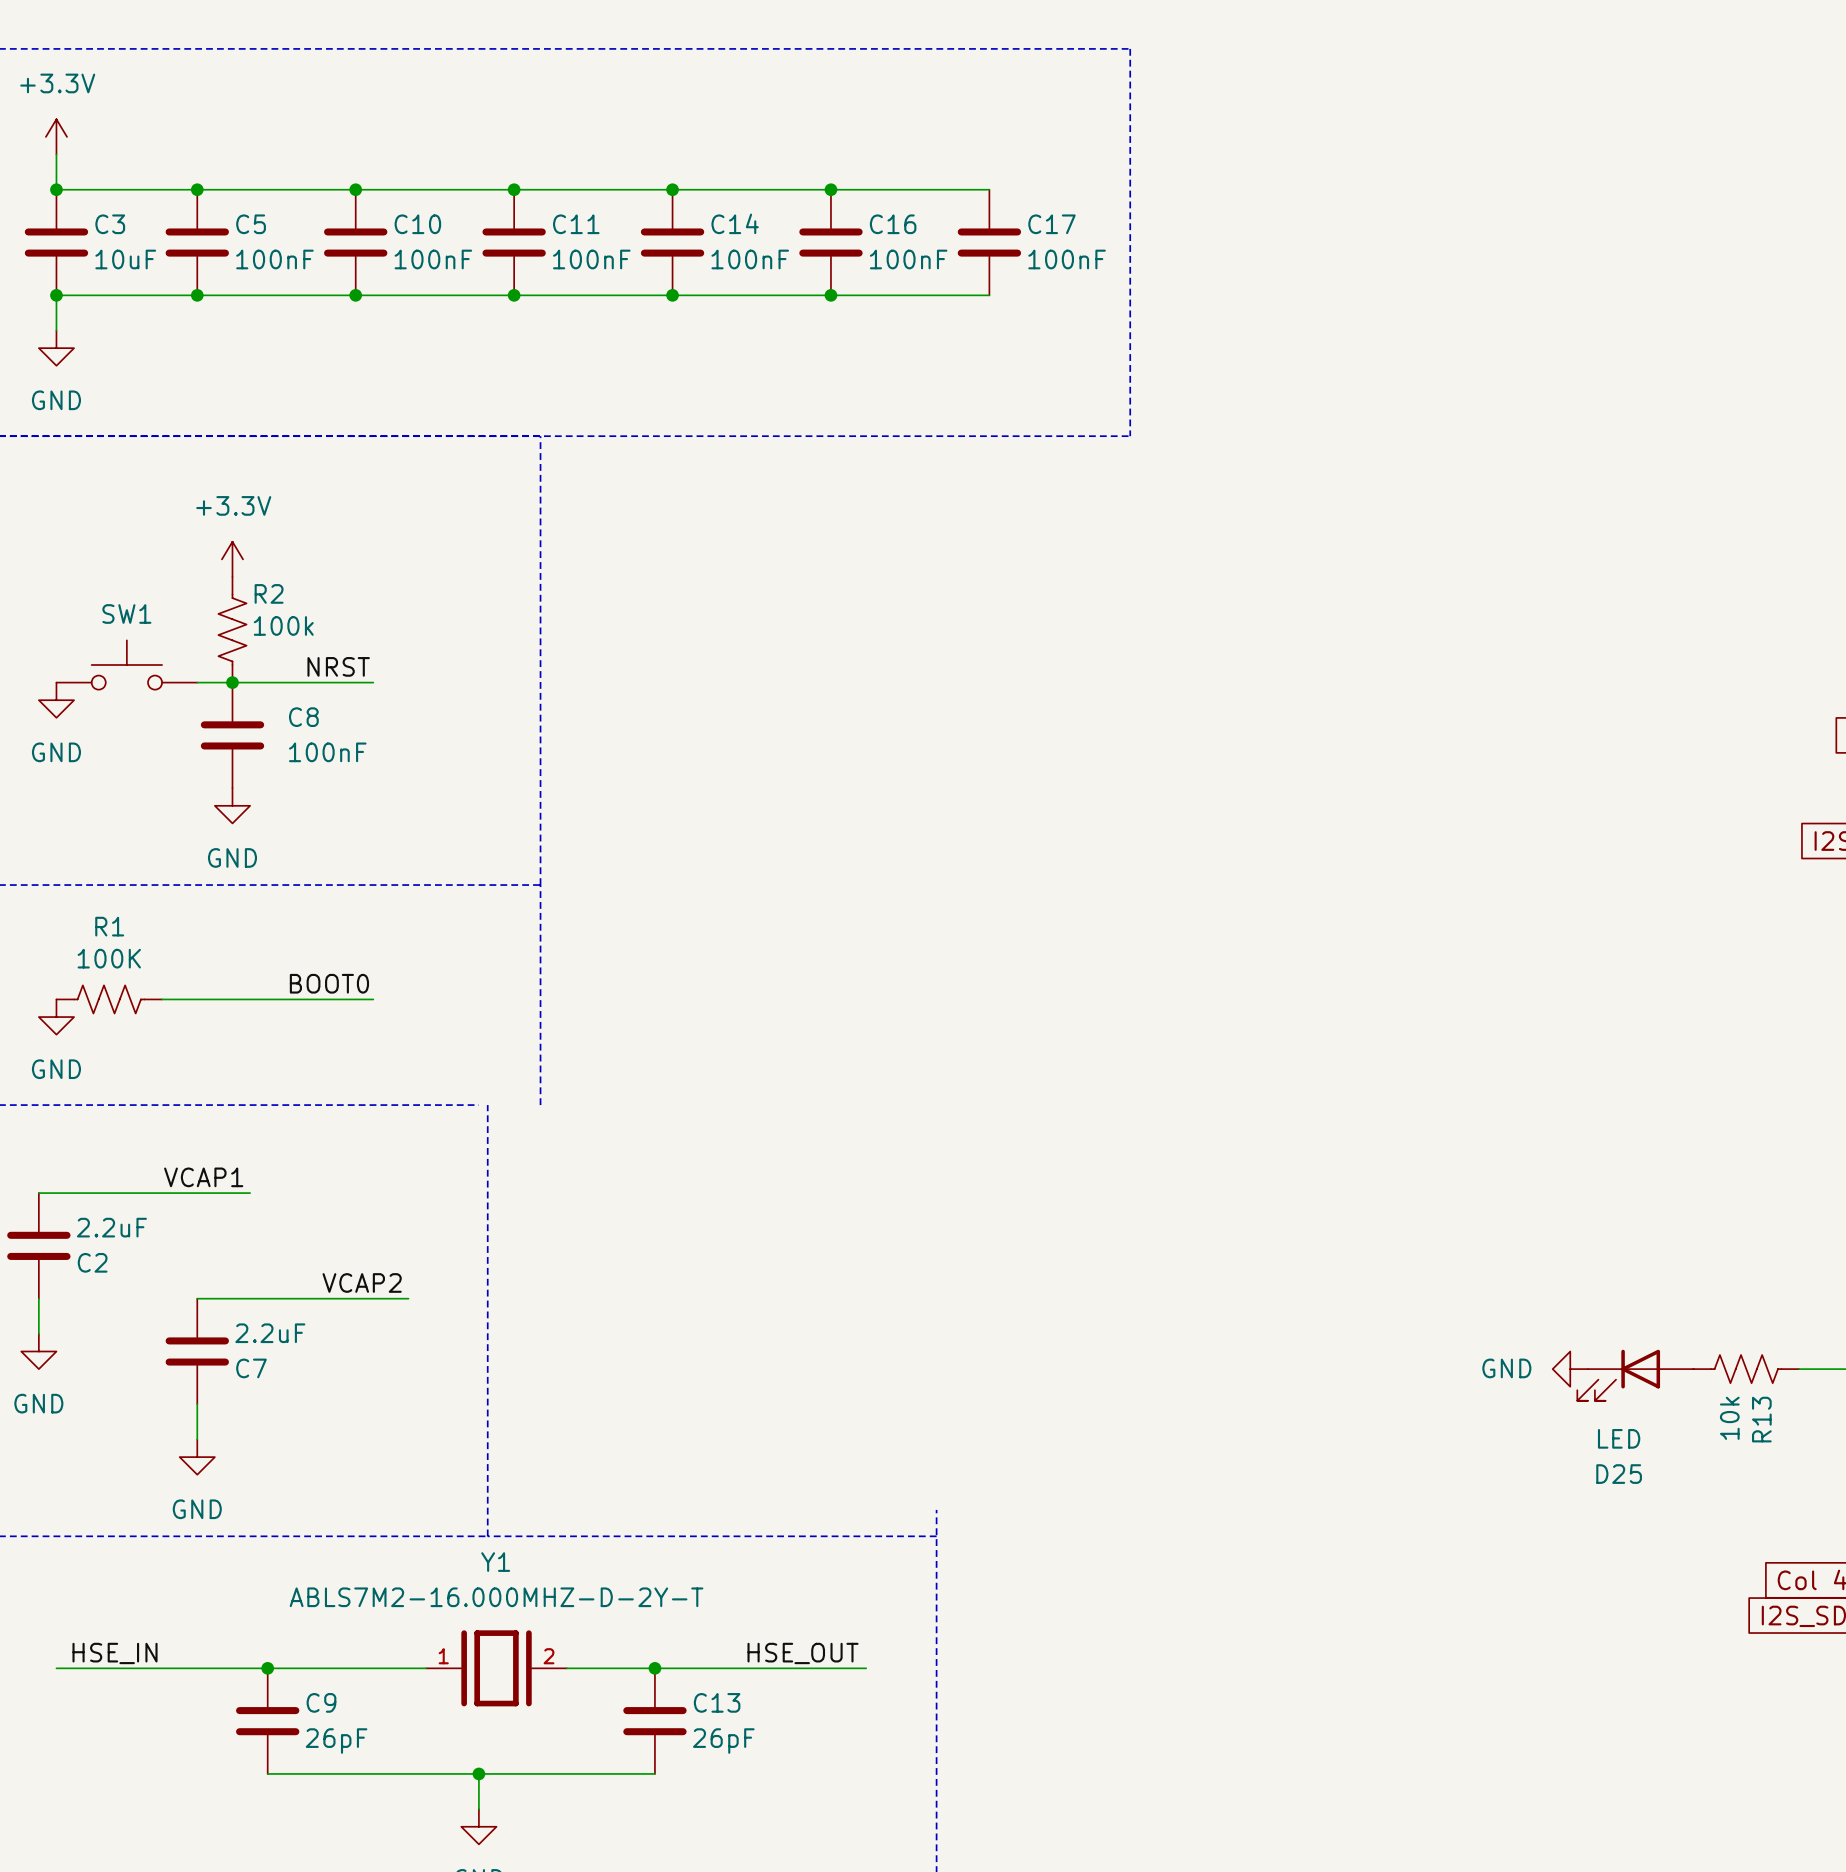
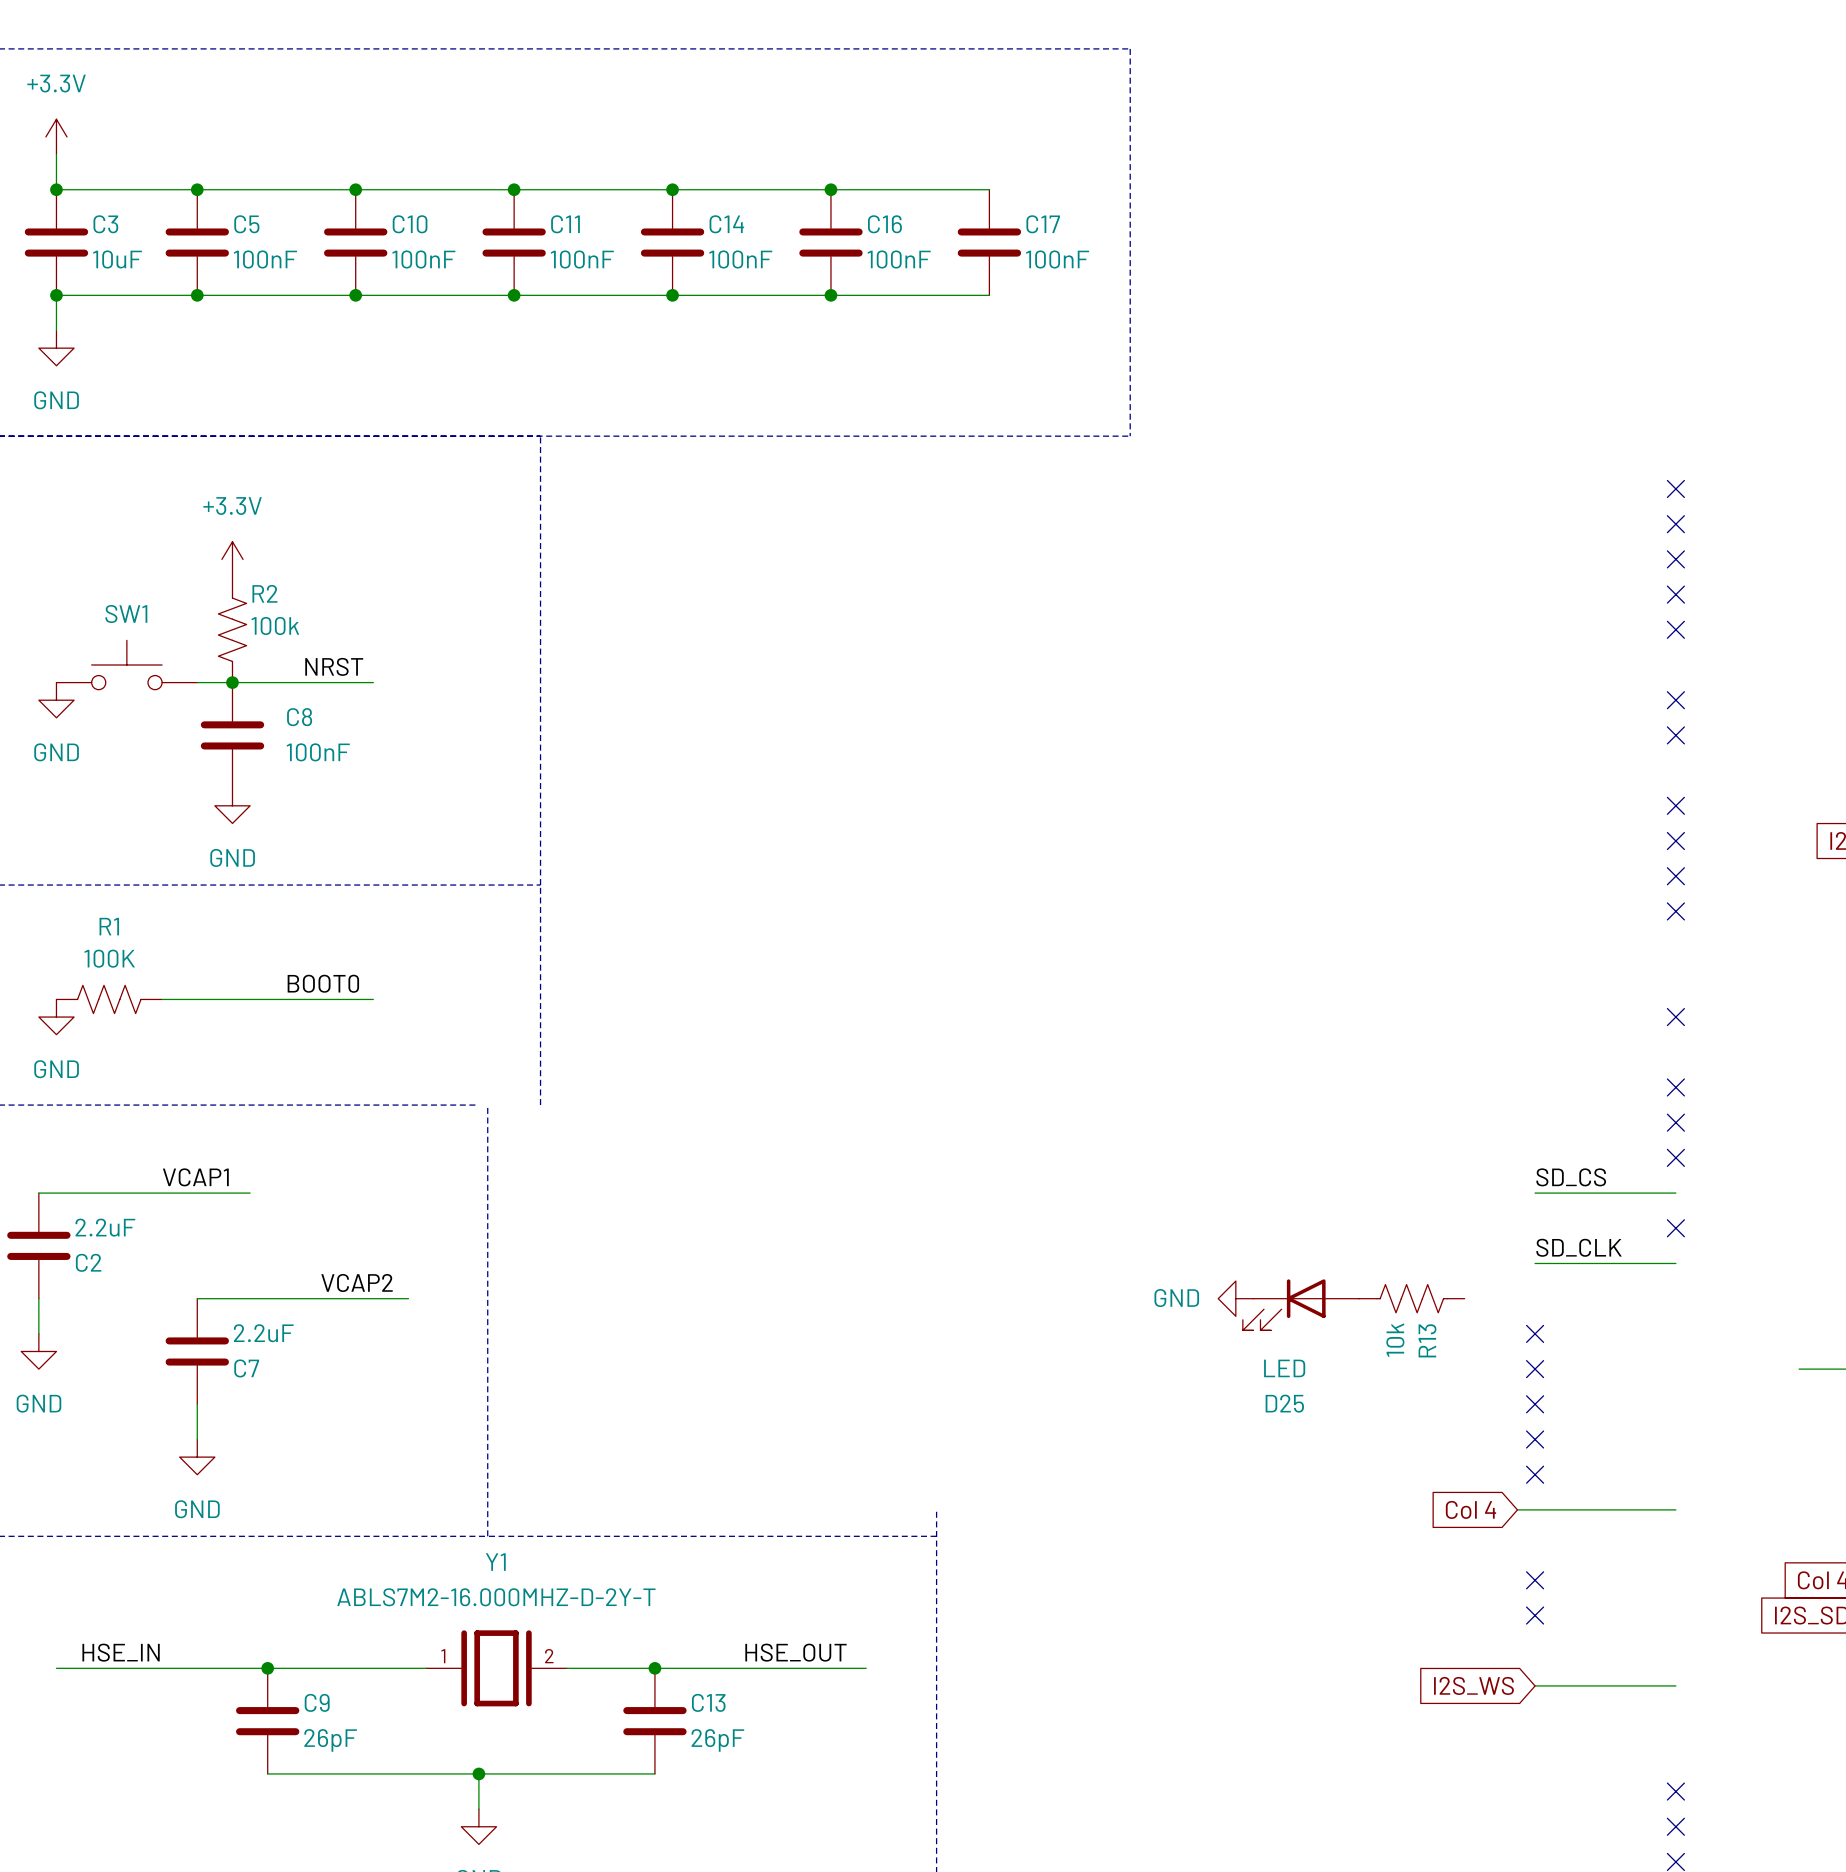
no-connect mark: none -> (1675, 488)
no-connect mark: none -> (1675, 524)
no-connect mark: none -> (1675, 559)
no-connect mark: none -> (1675, 594)
no-connect mark: none -> (1675, 629)
no-connect mark: none -> (1675, 700)
no-connect mark: none -> (1675, 735)
no-connect mark: none -> (1675, 805)
no-connect mark: none -> (1675, 841)
no-connect mark: none -> (1675, 876)
no-connect mark: none -> (1675, 911)
no-connect mark: none -> (1675, 1017)
no-connect mark: none -> (1675, 1087)
no-connect mark: none -> (1675, 1122)
no-connect mark: none -> (1675, 1157)
label: none -> SD_CS (1571, 1177)
wire: none -> (1535, 1193) (1675, 1193)
no-connect mark: none -> (1675, 1228)
label: none -> SD_CLK (1579, 1247)
wire: none -> (1535, 1263) (1675, 1263)
no-connect mark: none -> (1535, 1333)
no-connect mark: none -> (1535, 1369)
power symbol position: GND (1570, 1369) -> GND (1235, 1298)
R13 position: (1746, 1369) -> (1411, 1298)
D25 position: (1635, 1375) -> (1300, 1304)
no-connect mark: none -> (1535, 1404)
no-connect mark: none -> (1535, 1439)
no-connect mark: none -> (1535, 1474)
global label: none -> Col 4 (1470, 1509)
wire: none -> (1517, 1509) (1675, 1509)
no-connect mark: none -> (1535, 1580)
no-connect mark: none -> (1535, 1615)
wire: none -> (1535, 1685) (1675, 1685)
global label: none -> I2S_WS (1473, 1685)
no-connect mark: none -> (1675, 1791)
no-connect mark: none -> (1675, 1826)
no-connect mark: none -> (1675, 1861)

